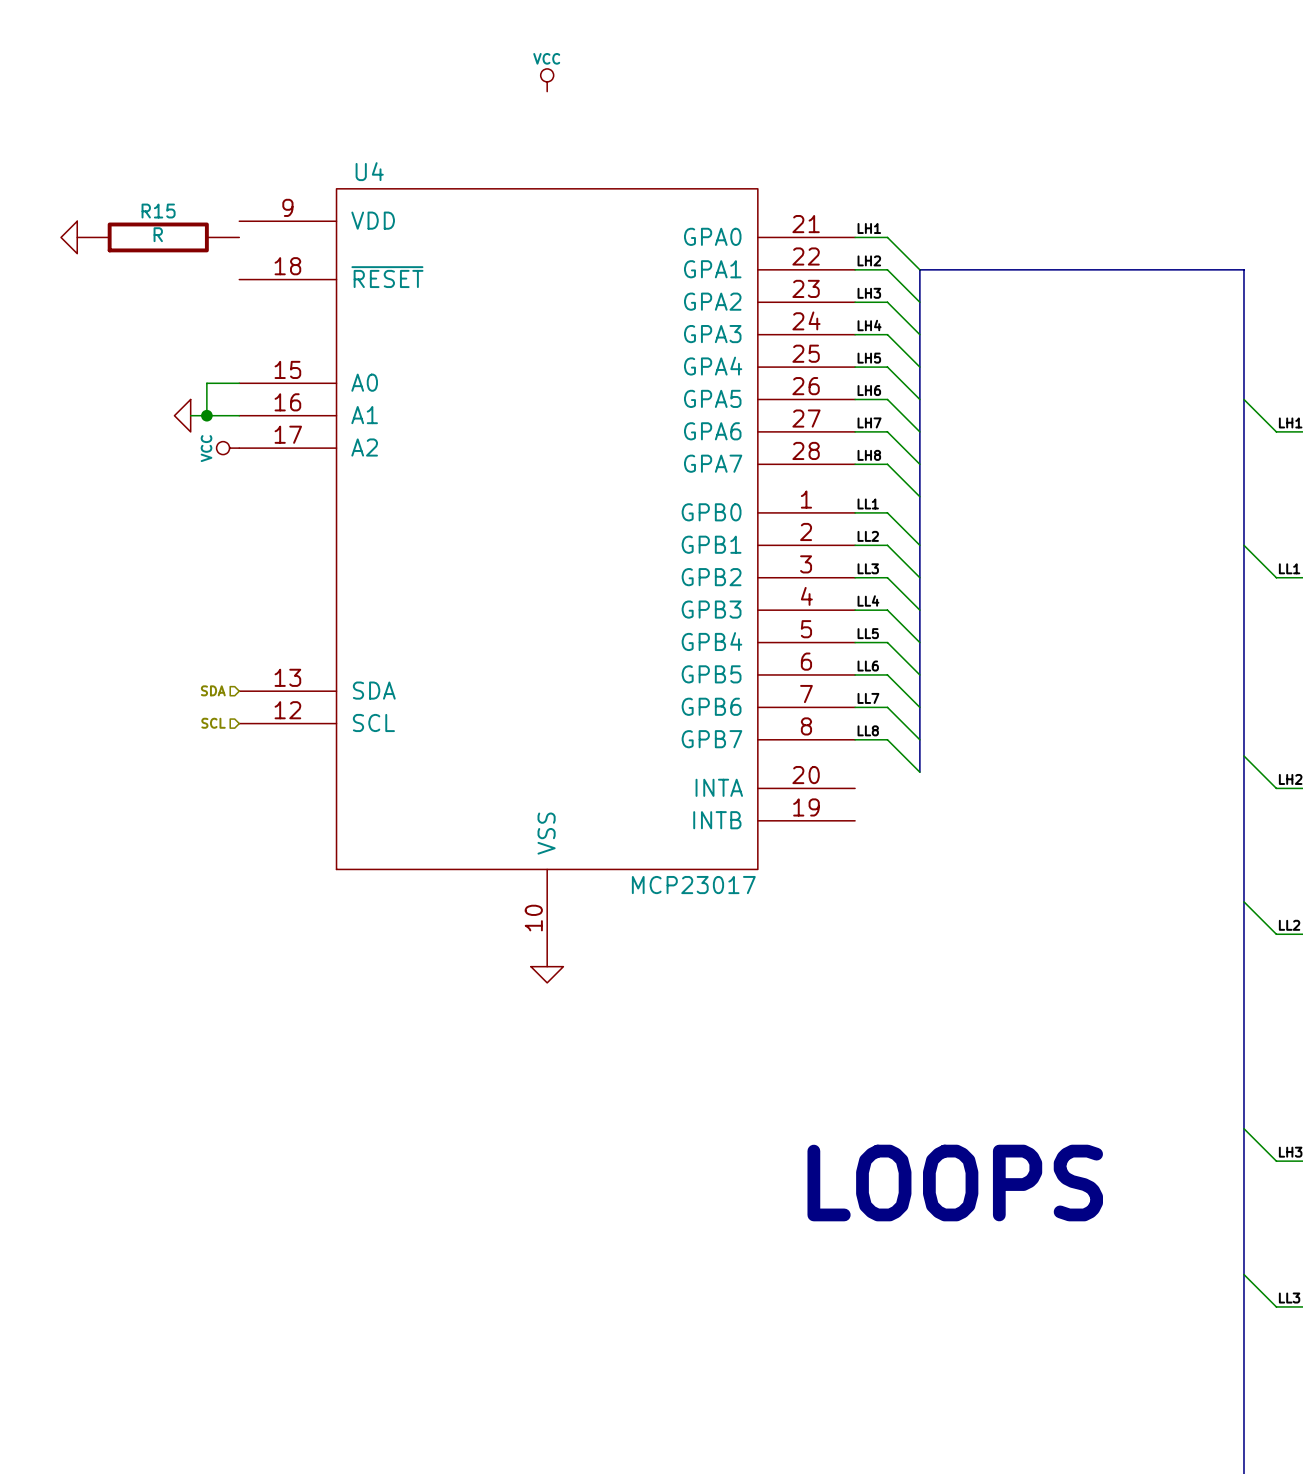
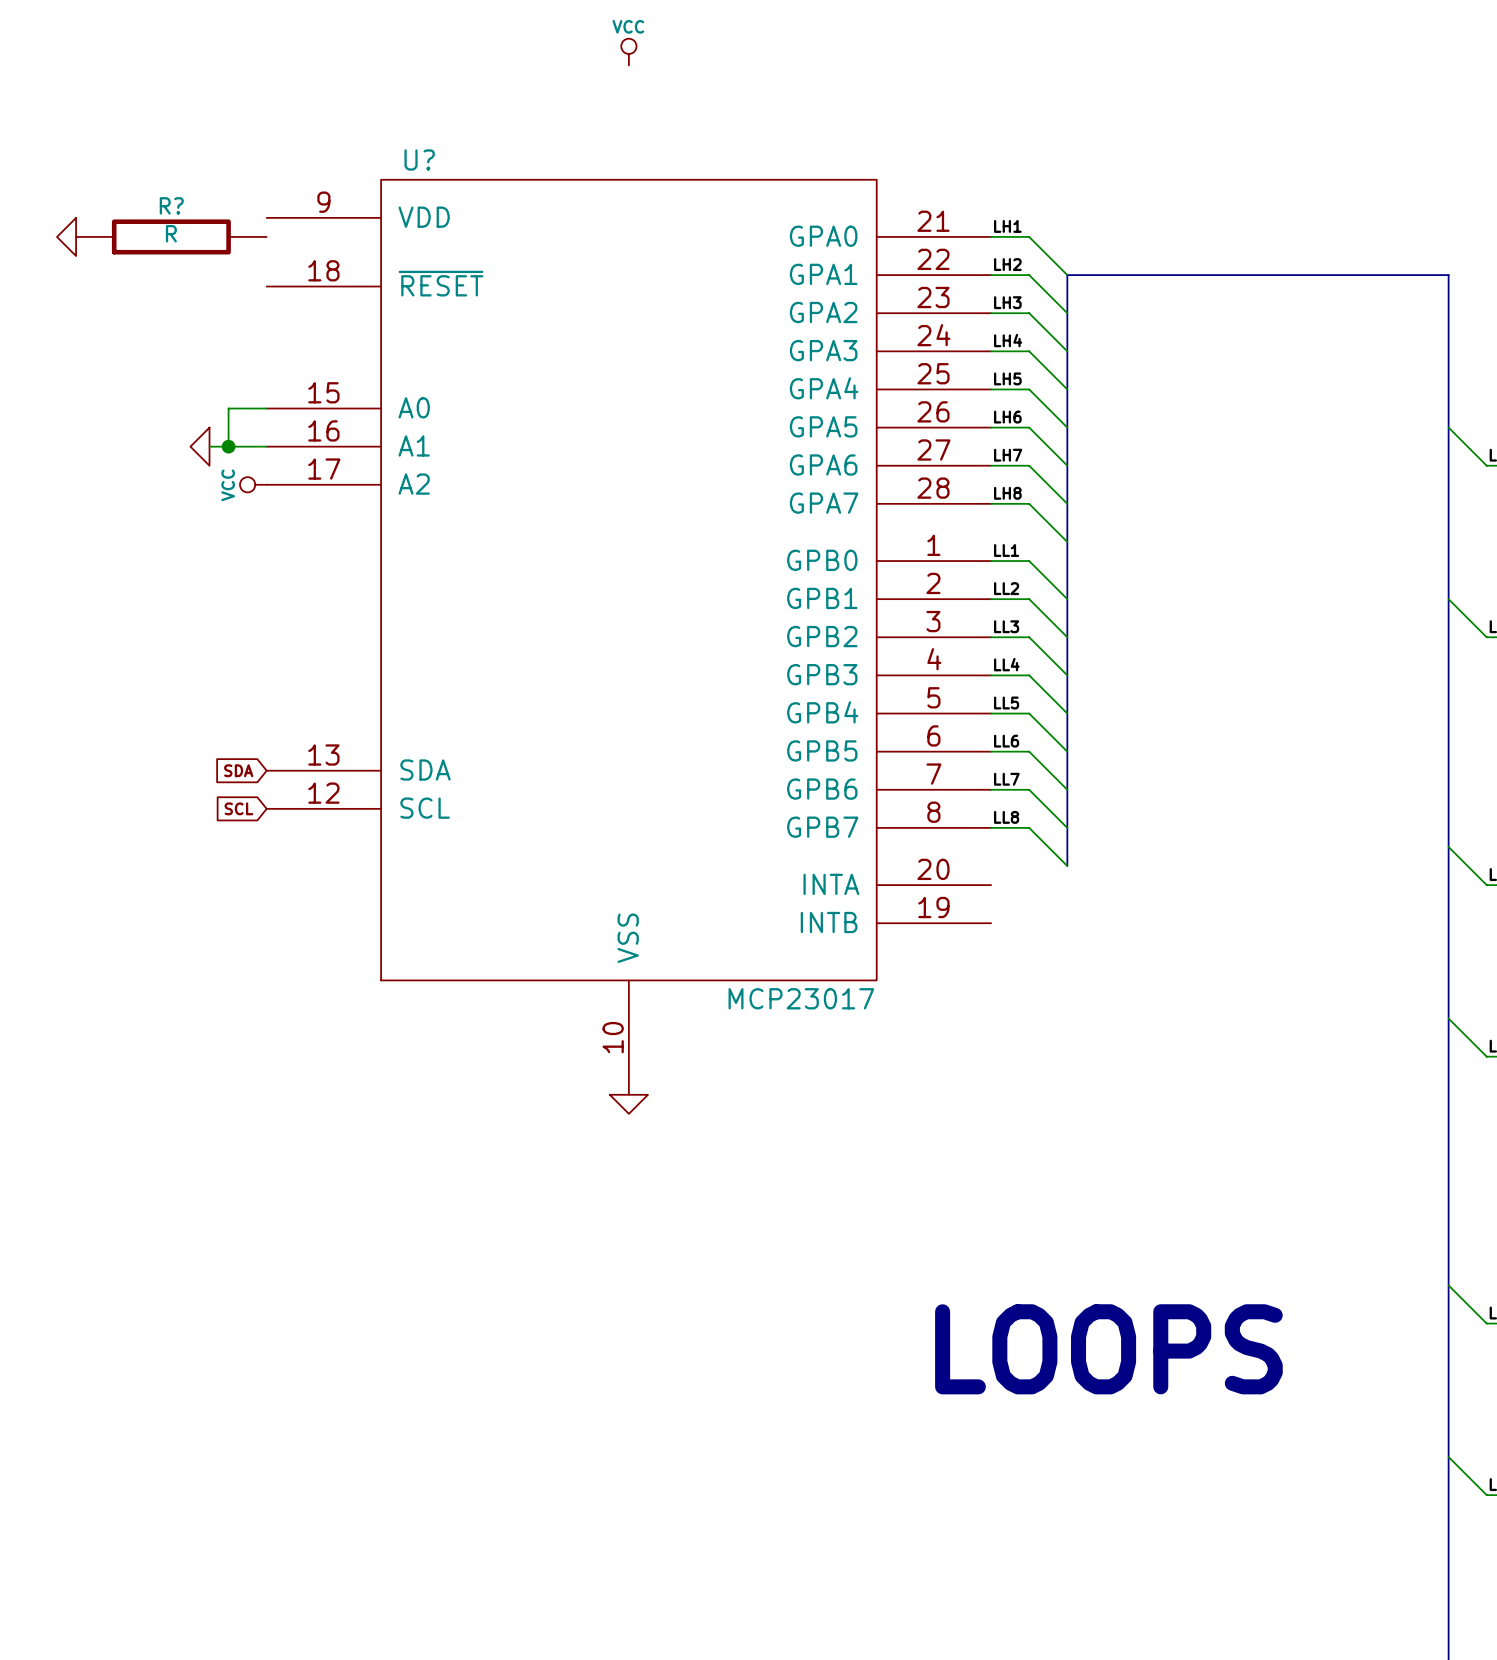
U4 name: U4 (369, 171) -> U? (419, 159)
R15 name: R15 (158, 211) -> R? (171, 205)
hierarchical label: SDA (213, 690) -> none
global label: none -> SDA (238, 770)
hierarchical label: SCL (213, 723) -> none
global label: none -> SCL (238, 808)

